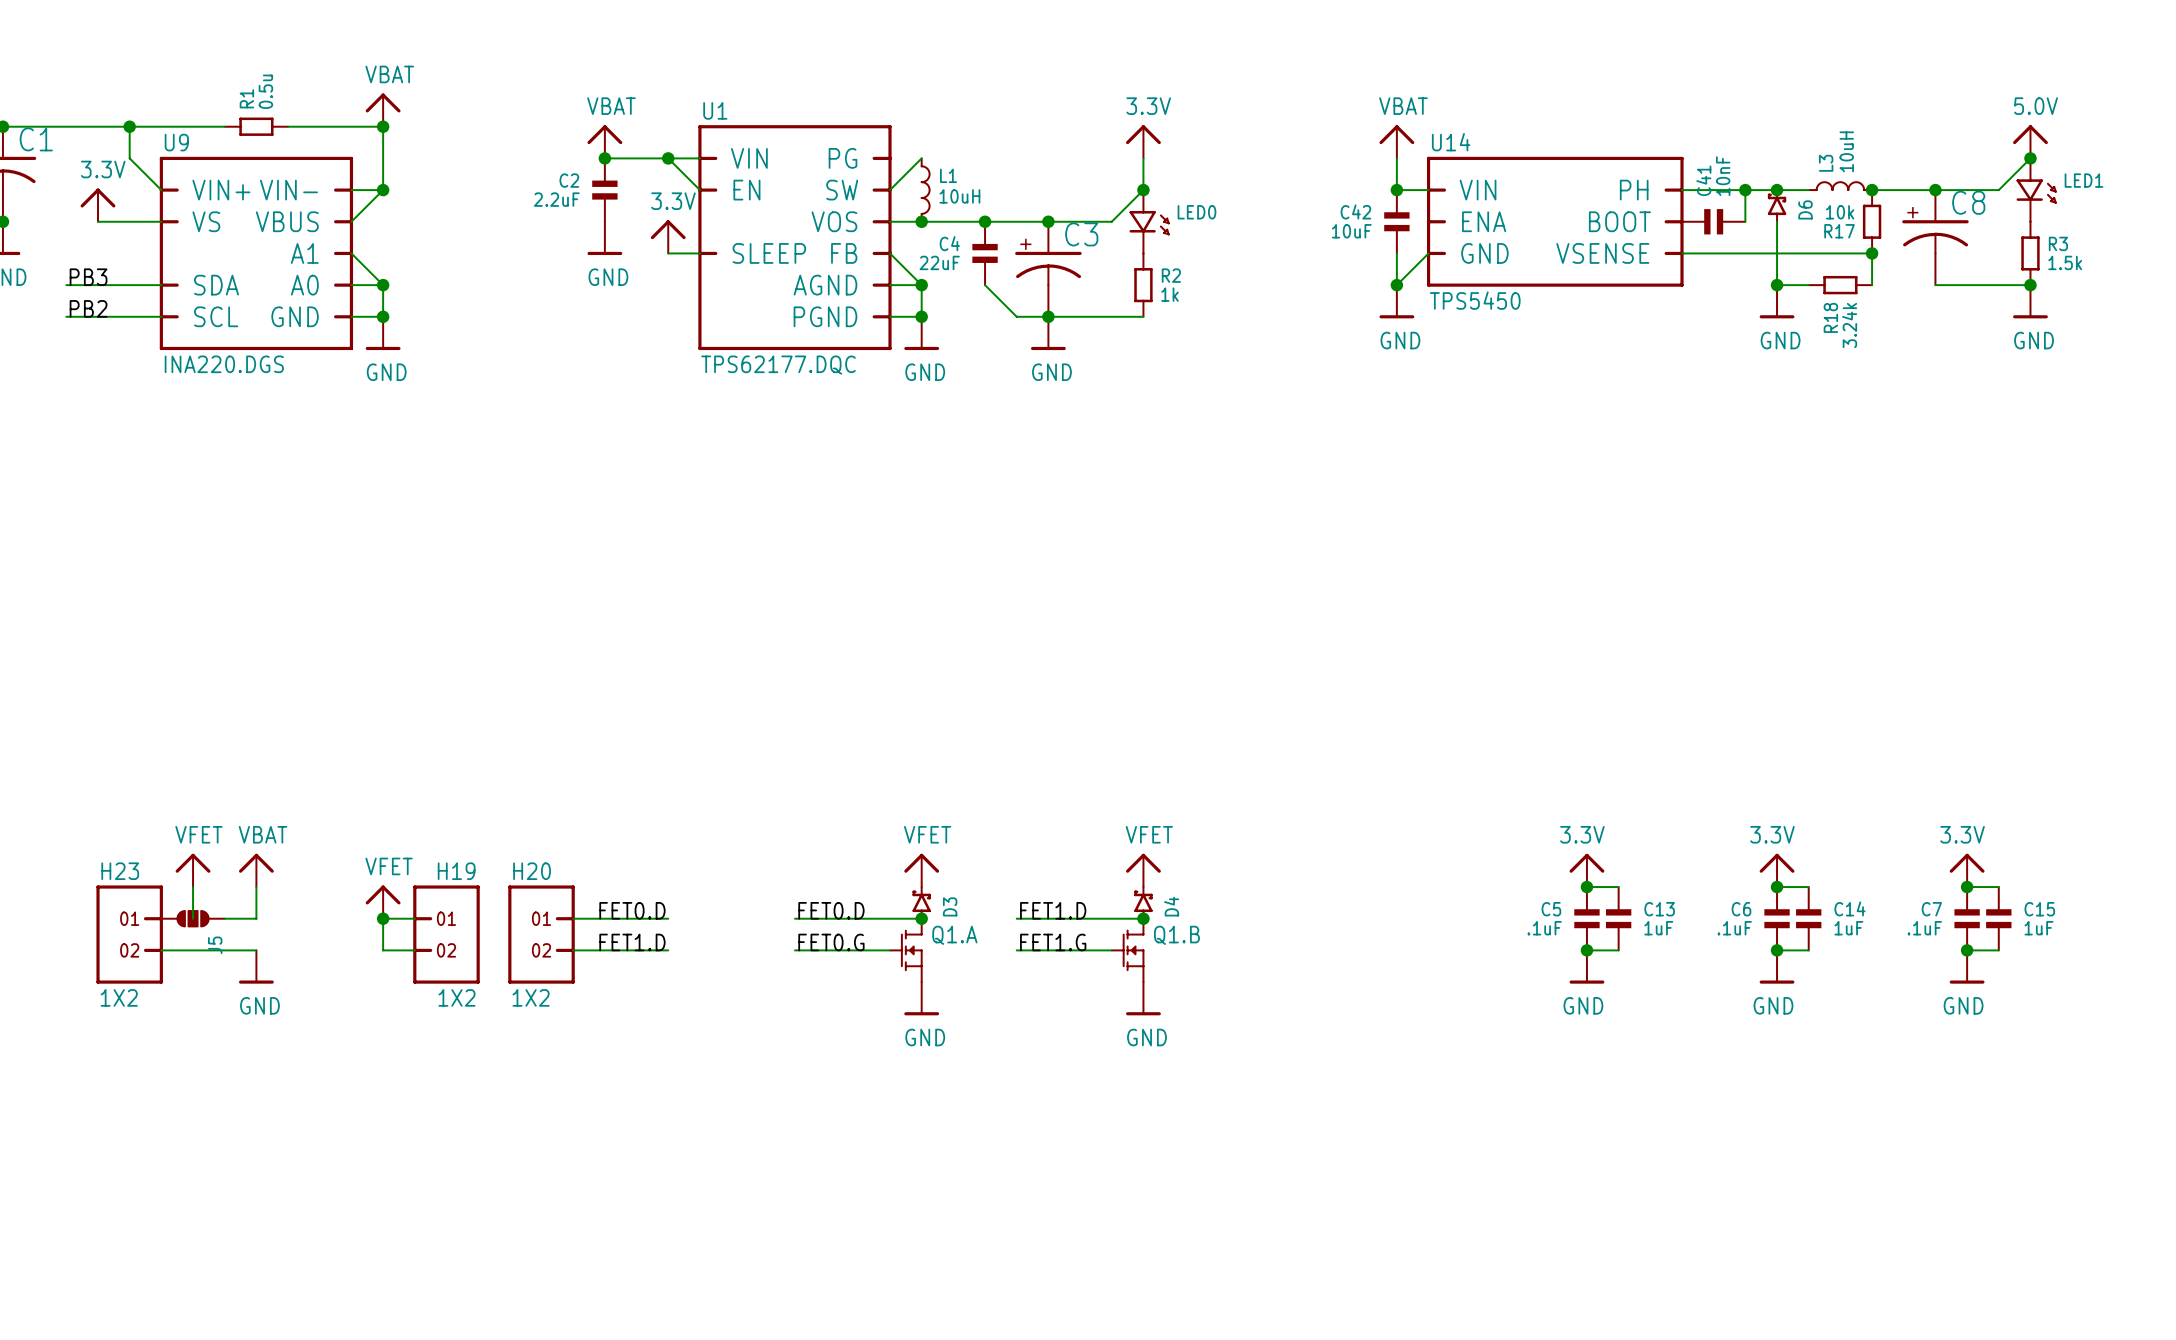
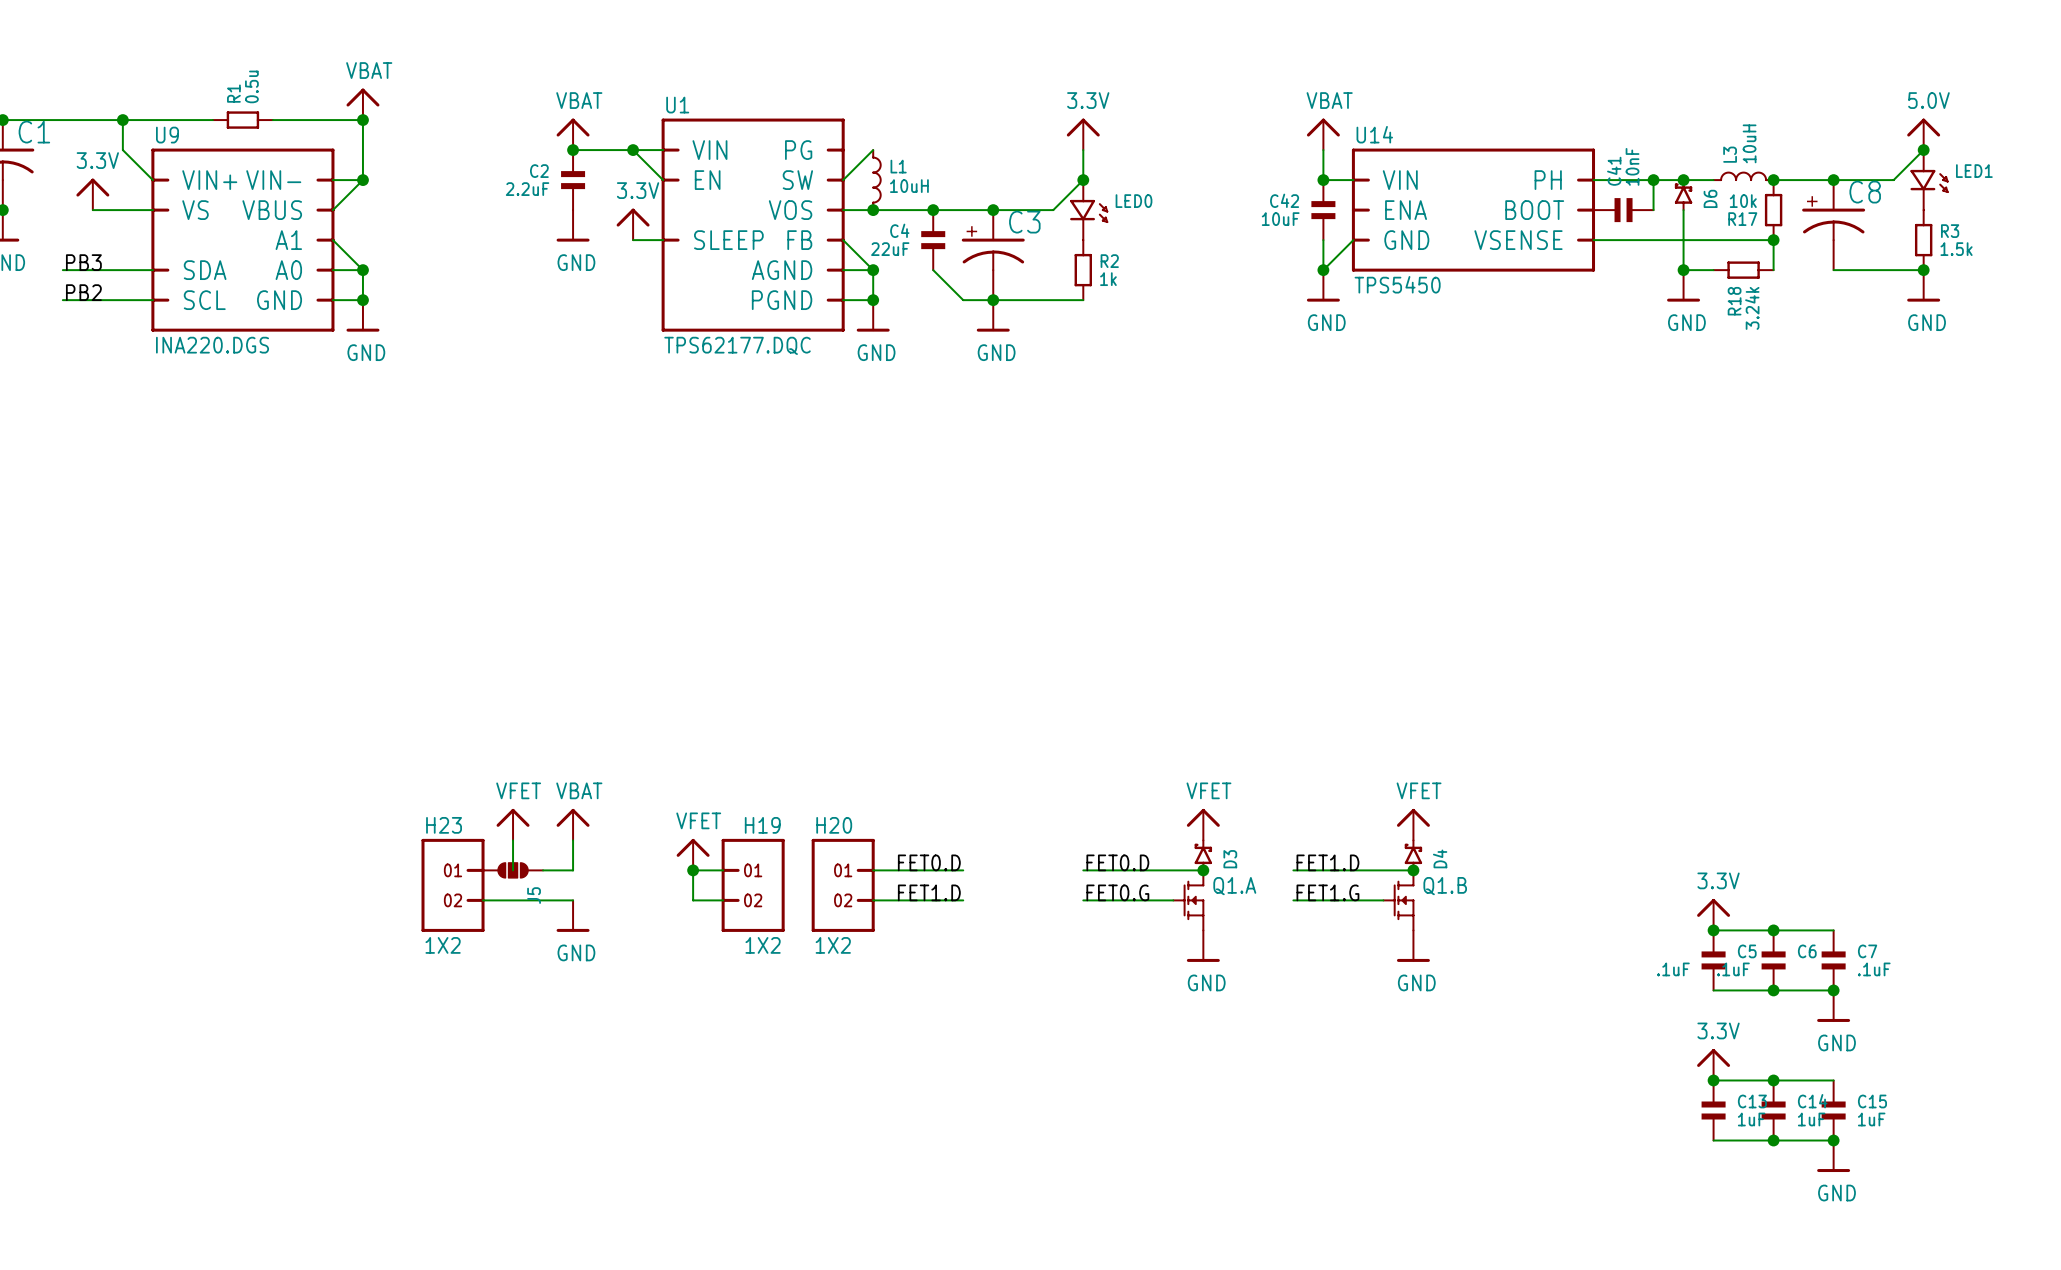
power symbol: VFET (193, 870) -> none
power symbol: VBAT (256, 870) -> none
power symbol: none -> VBAT (573, 824)
power symbol: VFET (921, 870) -> none
power symbol position: VFET (1143, 870) -> VFET (1203, 824)
power symbol: none -> VFET (1413, 824)
power symbol: 3.3V (1586, 870) -> none
power symbol: 3.3V (1777, 870) -> none
power symbol: 3.3V (1967, 870) -> none
wire: (193, 887) (193, 918) -> none
wire: (256, 887) (256, 918) (224, 918) -> none
wire: none -> (513, 840) (513, 870)
wire: (1586, 887) (1618, 887) -> none
junction: (1586, 887) -> none
wire: (1777, 887) (1808, 887) -> none
junction: (1777, 887) -> none
wire: (1967, 887) (1998, 887) -> none
junction: (1967, 887) -> none
power symbol position: VFET (383, 902) -> VFET (513, 824)
power symbol: none -> VFET (693, 854)
D3 position: (921, 902) -> (1203, 855)
D4 position: (1143, 902) -> (1413, 855)
C5 name position: C5 (1551, 909) -> C5 (1747, 951)
C6 name position: C6 (1741, 909) -> C6 (1807, 951)
C7 name position: C7 (1931, 909) -> C7 (1867, 951)
label: FET0.D (632, 910) -> none
label: FET0.D (831, 910) -> none
label: FET1.D (1053, 910) -> FET0.D (929, 862)
label: none -> FET0.D (1117, 862)
label: none -> FET1.D (1327, 862)
J5 position: (193, 918) -> (513, 870)
junction: (383, 918) -> none
wire: (414, 918) (383, 918) (383, 950) (414, 950) -> none
wire: (604, 918) (668, 918) -> (573, 870) (573, 840)
junction: none -> (693, 870)
wire: none -> (723, 870) (693, 870) (693, 900) (723, 900)
wire: (794, 918) (921, 918) -> (963, 870) (873, 870)
junction: (921, 918) -> none
wire: (1016, 918) (1143, 918) -> (1203, 870) (1083, 870)
junction: (1143, 918) -> none
junction: none -> (1203, 870)
wire: none -> (1293, 870) (1413, 870)
junction: none -> (1413, 870)
C5 position: (1586, 918) -> (1713, 960)
C13 position: (1618, 918) -> (1713, 1110)
C6 position: (1777, 918) -> (1773, 960)
C14 position: (1808, 918) -> (1773, 1110)
C7 position: (1967, 918) -> (1833, 960)
C15 position: (1998, 918) -> (1833, 1110)
C7 value position: .1uF (1924, 928) -> .1uF (1874, 969)
H23 position: (129, 934) -> (453, 885)
H19 position: (446, 934) -> (753, 885)
H20 position: (541, 934) -> (843, 885)
label: FET1.D (632, 942) -> none
label: FET0.G (831, 942) -> none
label: FET1.G (1053, 942) -> FET1.D (929, 892)
label: none -> FET0.G (1117, 892)
label: none -> FET1.G (1327, 892)
wire: (161, 950) (256, 950) -> none
wire: (604, 950) (668, 950) -> (483, 900) (543, 900)
wire: (794, 950) (890, 950) -> none
Q1.A position: (905, 950) -> (1188, 900)
wire: (1016, 950) (1111, 950) -> (963, 900) (873, 900)
Q1.B position: (1127, 950) -> (1398, 900)
wire: none -> (1083, 900) (1173, 900)
wire: none -> (1293, 900) (1383, 900)
wire: (1586, 950) (1618, 950) -> none
junction: (1586, 950) -> none
wire: (1777, 950) (1808, 950) -> none
junction position: (1777, 950) -> (1713, 930)
wire: (1967, 950) (1998, 950) -> none
junction: (1967, 950) -> none
power symbol: none -> 3.3V (1713, 914)
power symbol: GND (256, 967) -> none
power symbol: none -> GND (573, 916)
power symbol position: GND (1586, 967) -> GND (1413, 946)
power symbol: GND (1777, 967) -> none
power symbol: GND (1967, 967) -> none
wire: none -> (1713, 930) (1833, 930)
junction: none -> (1773, 930)
power symbol: GND (921, 998) -> none
power symbol position: GND (1143, 998) -> GND (1203, 946)
power symbol text position: GND (1583, 1005) -> GND (1416, 982)
wire: none -> (1713, 990) (1833, 990)
junction: none -> (1773, 990)
junction: none -> (1833, 990)
power symbol: none -> GND (1833, 1006)
power symbol: none -> 3.3V (1713, 1064)
wire: none -> (1713, 1080) (1833, 1080)
junction: none -> (1713, 1080)
junction: none -> (1773, 1080)
wire: none -> (1713, 1140) (1833, 1140)
junction: none -> (1773, 1140)
junction: none -> (1833, 1140)
power symbol: none -> GND (1833, 1156)

